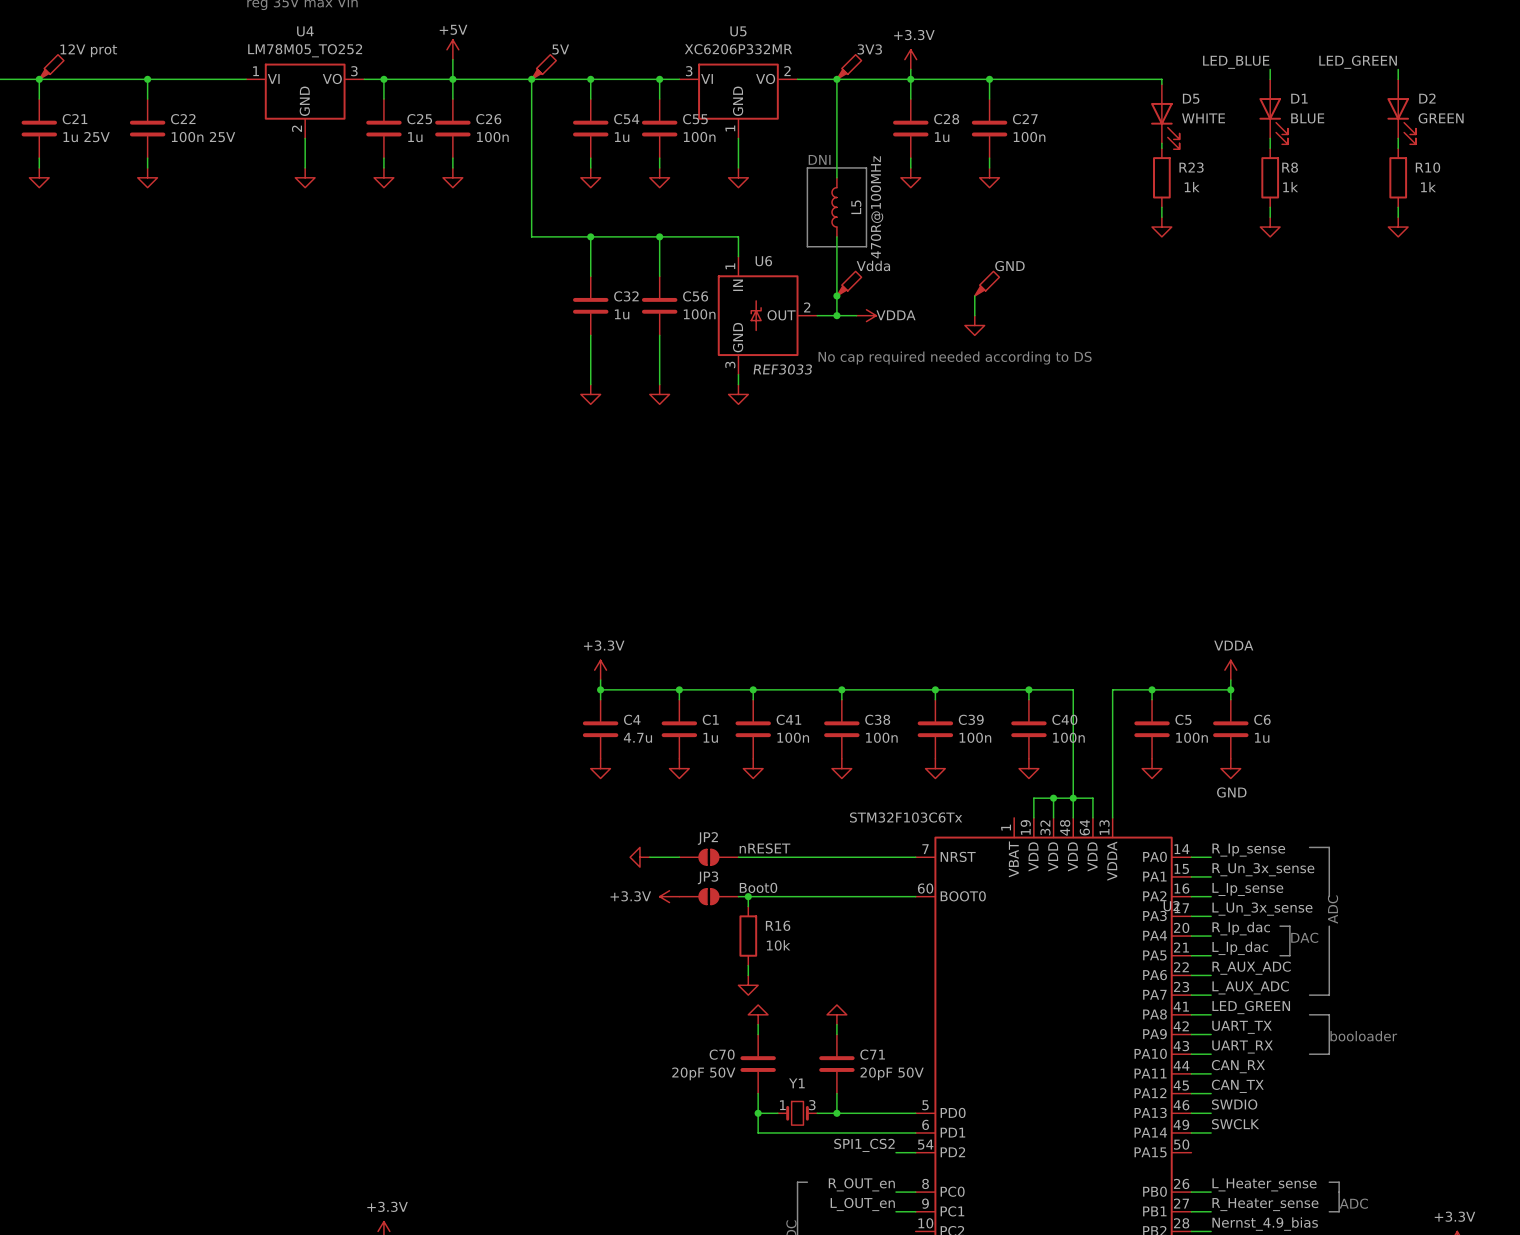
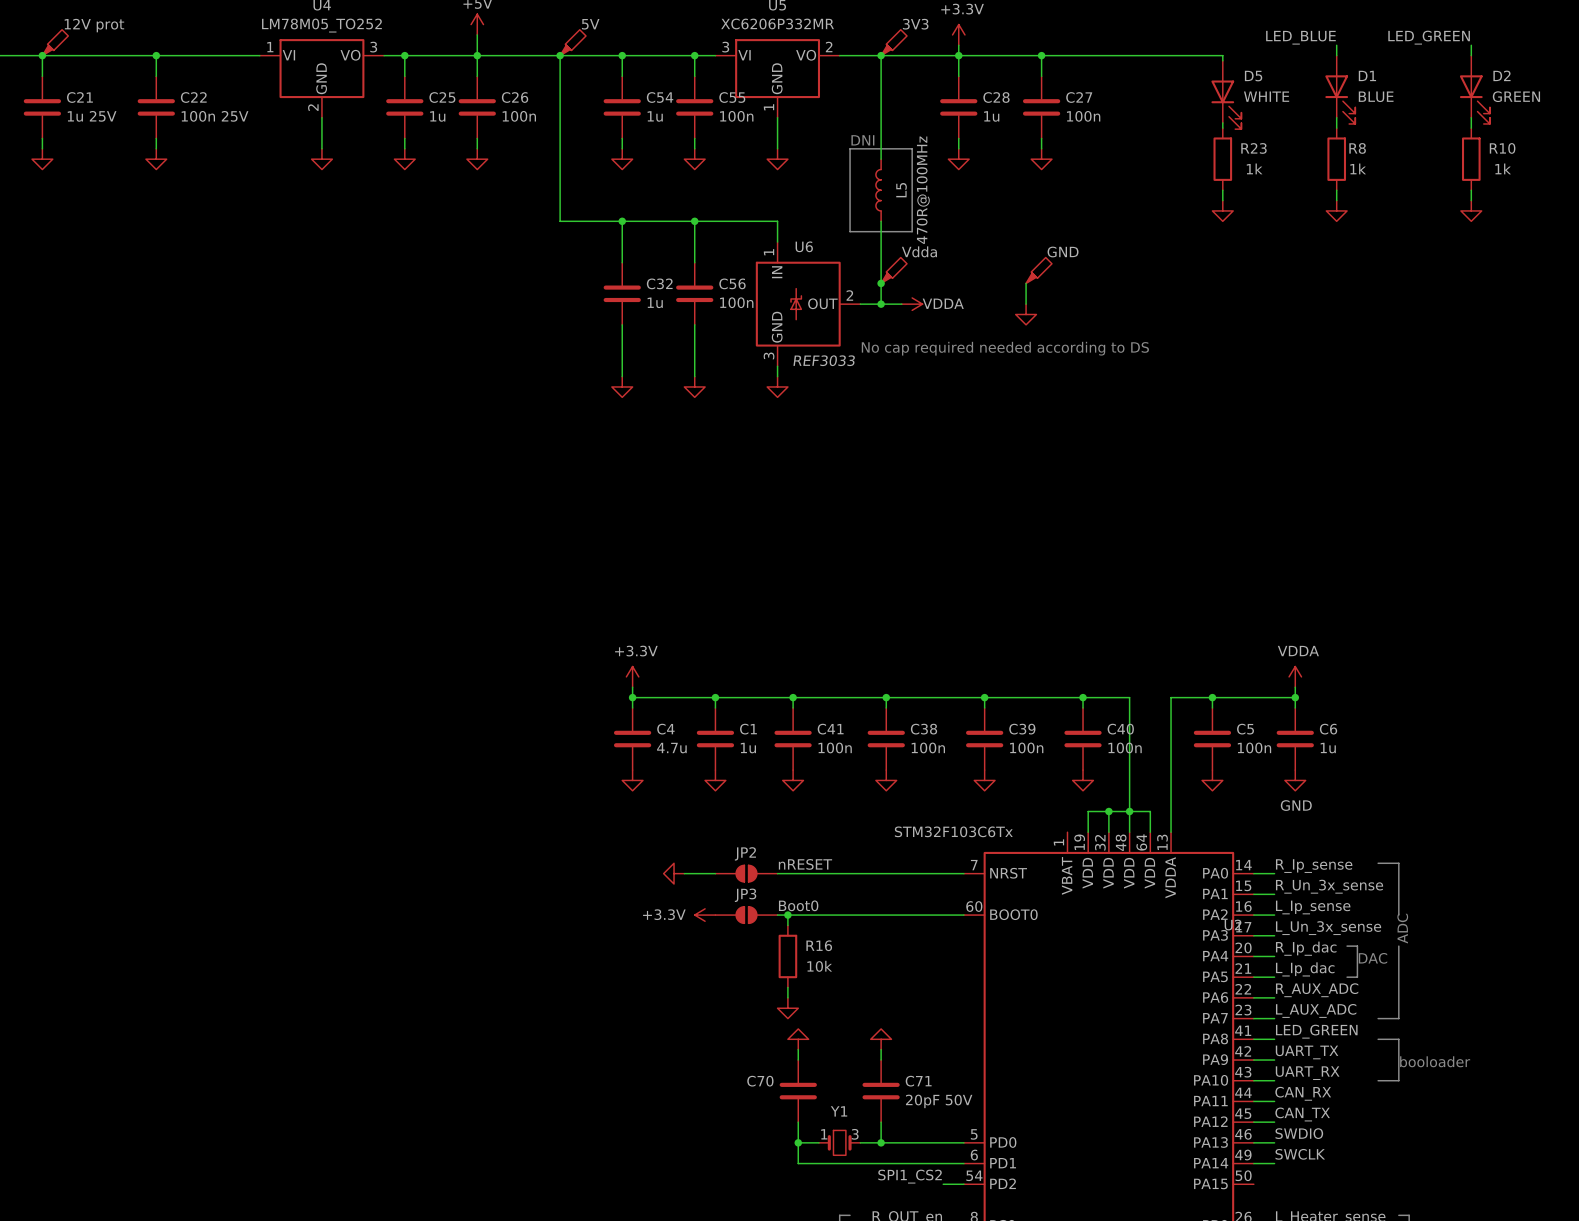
C70 value: 20pF 50V (703, 1073) -> none

